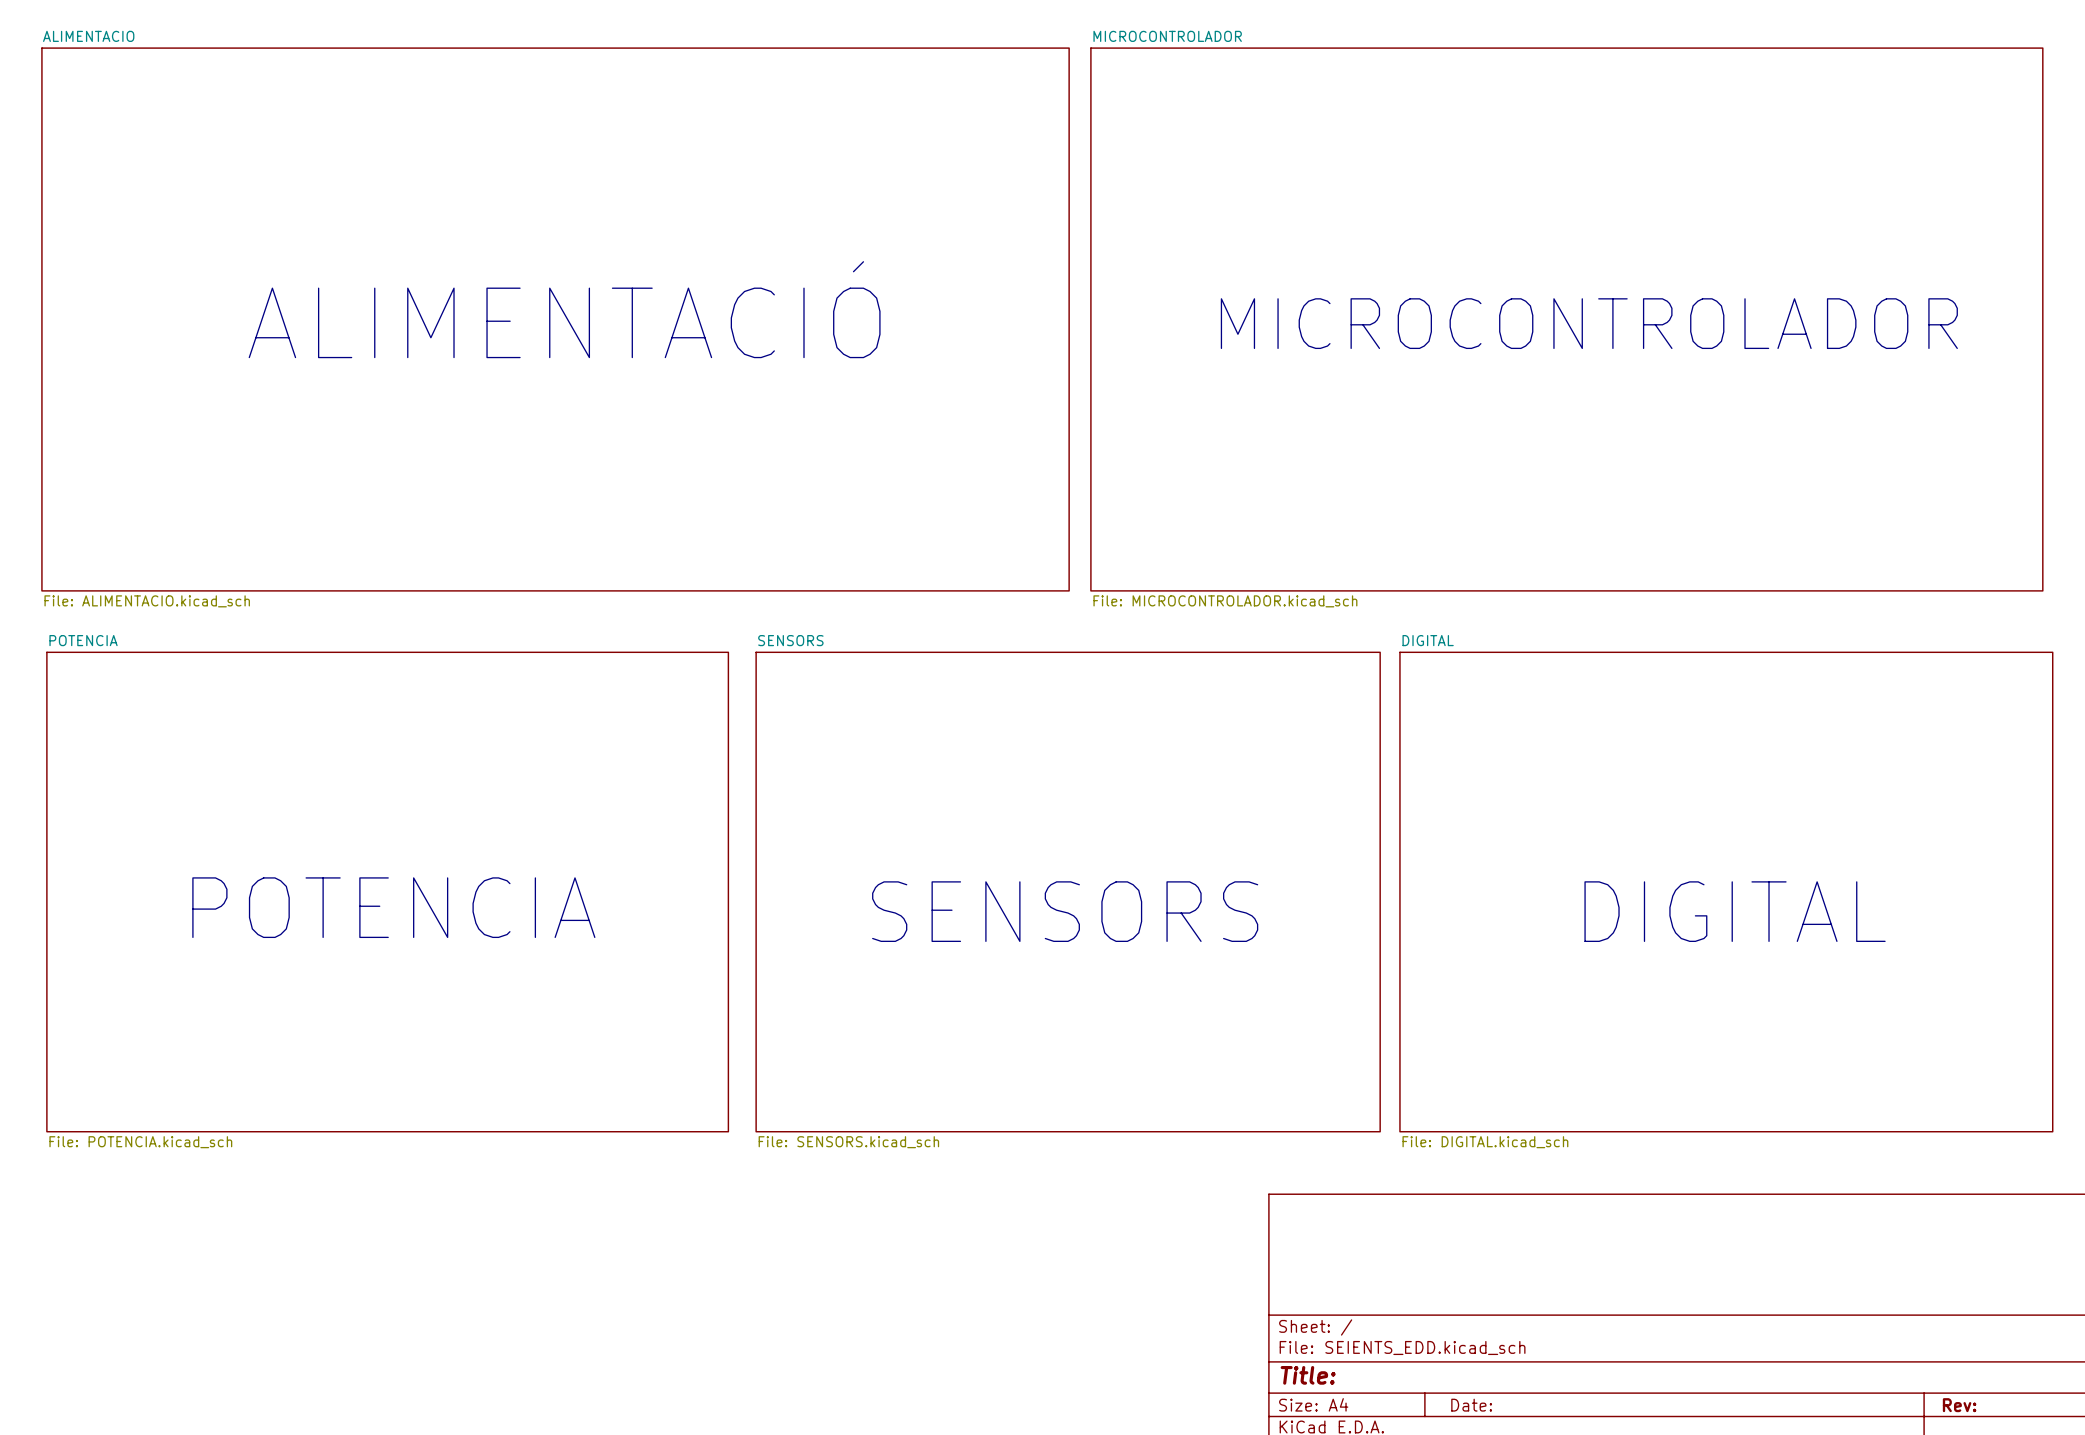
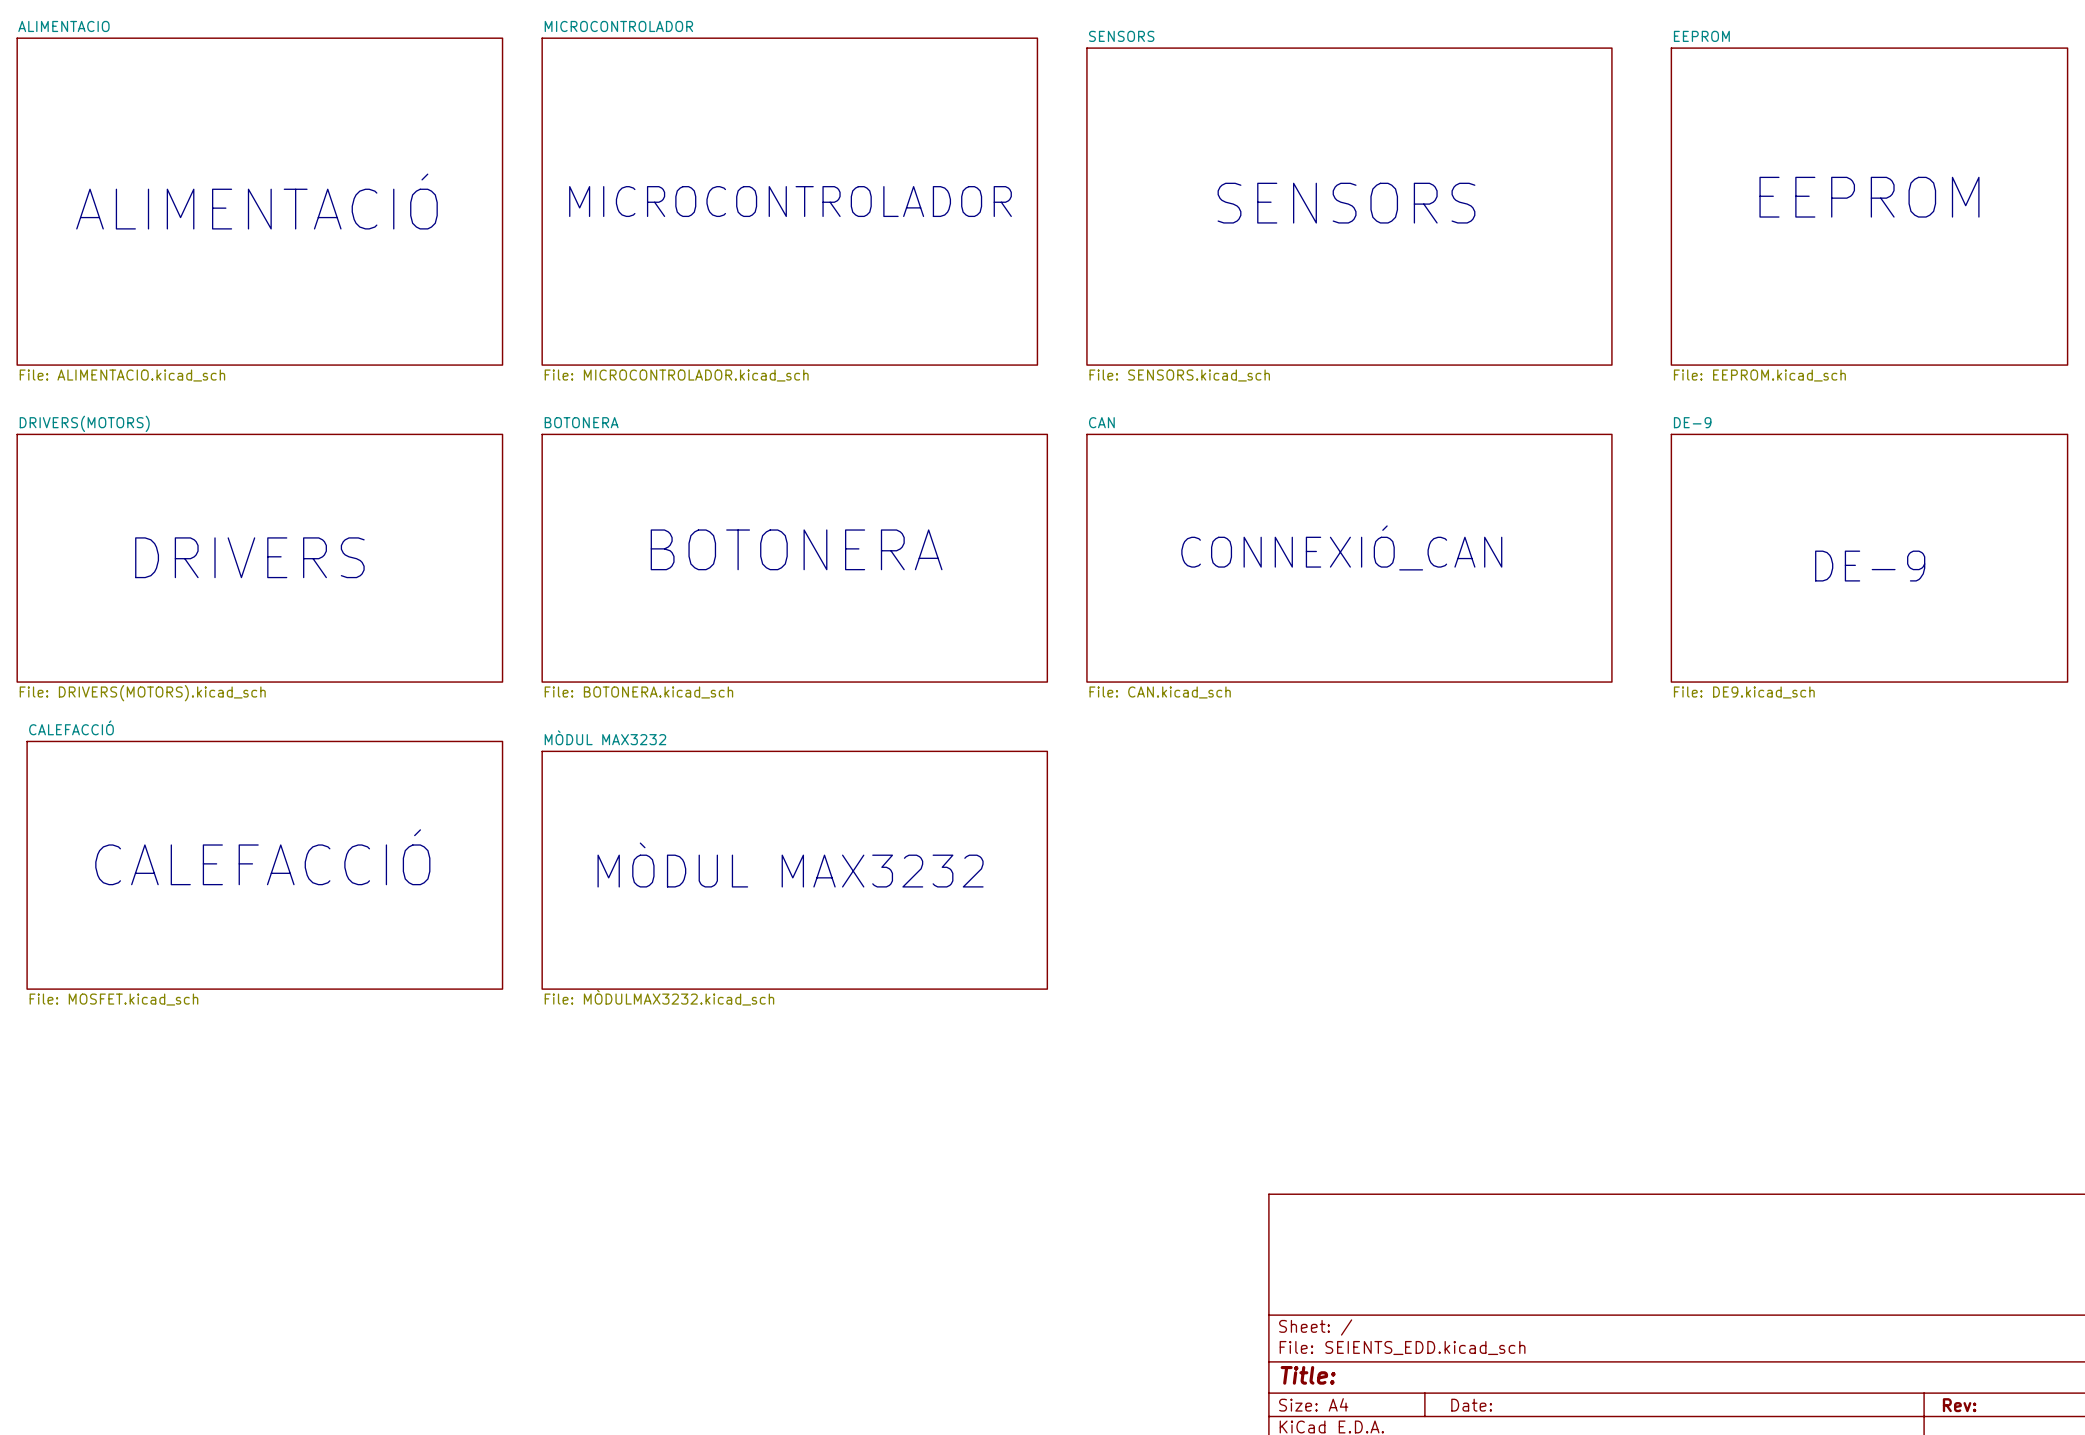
text: none -> EEPROM (1869, 197)
text: none -> ALIMENTACIÓ (256, 201)
sheet ALIMENTACIO: none -> File: ALIMENTACIO.kicad_sch (259, 201)
sheet MICROCONTROLADOR: none -> File: MICROCONTROLADOR.kicad_sch (789, 201)
text: none -> MICROCONTROLADOR (790, 201)
text: none -> SENSORS (1346, 203)
sheet SENSORS: none -> File: SENSORS.kicad_sch (1349, 206)
sheet EEPROM: none -> File: EEPROM.kicad_sch (1869, 206)
text: ALIMENTACIÓ (564, 309) -> none
sheet ALIMENTACIO: File: ALIMENTACIO.kicad_sch (555, 319) -> none
sheet MICROCONTROLADOR: File: MICROCONTROLADOR.kicad_sch (1566, 319) -> none
text: MICROCONTROLADOR (1589, 323) -> none
text: none -> CONNEXIÓ_CAN (1341, 547)
text: none -> BOTONERA (796, 549)
text: none -> DRIVERS (249, 557)
sheet DRIVERS(MOTORS): none -> File: DRIVERS(MOTORS).kicad_sch (259, 558)
sheet BOTONERA: none -> File: BOTONERA.kicad_sch (794, 558)
sheet CAN: none -> File: CAN.kicad_sch (1349, 558)
sheet DE-9: none -> File: DE9.kicad_sch (1869, 558)
text: none -> DE-9 (1870, 566)
text: none -> CALEFACCIÓ (262, 857)
sheet CALEFACCIÓ: none -> File: MOSFET.kicad_sch (264, 865)
text: none -> MÒDUL MAX3232 (790, 865)
sheet MÒDUL MAX3232: none -> File: MÒDULMAX3232.kicad_sch (794, 870)
sheet POTENCIA: File: POTENCIA.kicad_sch (387, 892) -> none
sheet SENSORS: File: SENSORS.kicad_sch (1068, 892) -> none
sheet DIGITAL: File: DIGITAL.kicad_sch (1726, 892) -> none
text: POTENCIA (393, 907) -> none
text: SENSORS (1065, 911) -> none
text: DIGITAL (1735, 911) -> none

